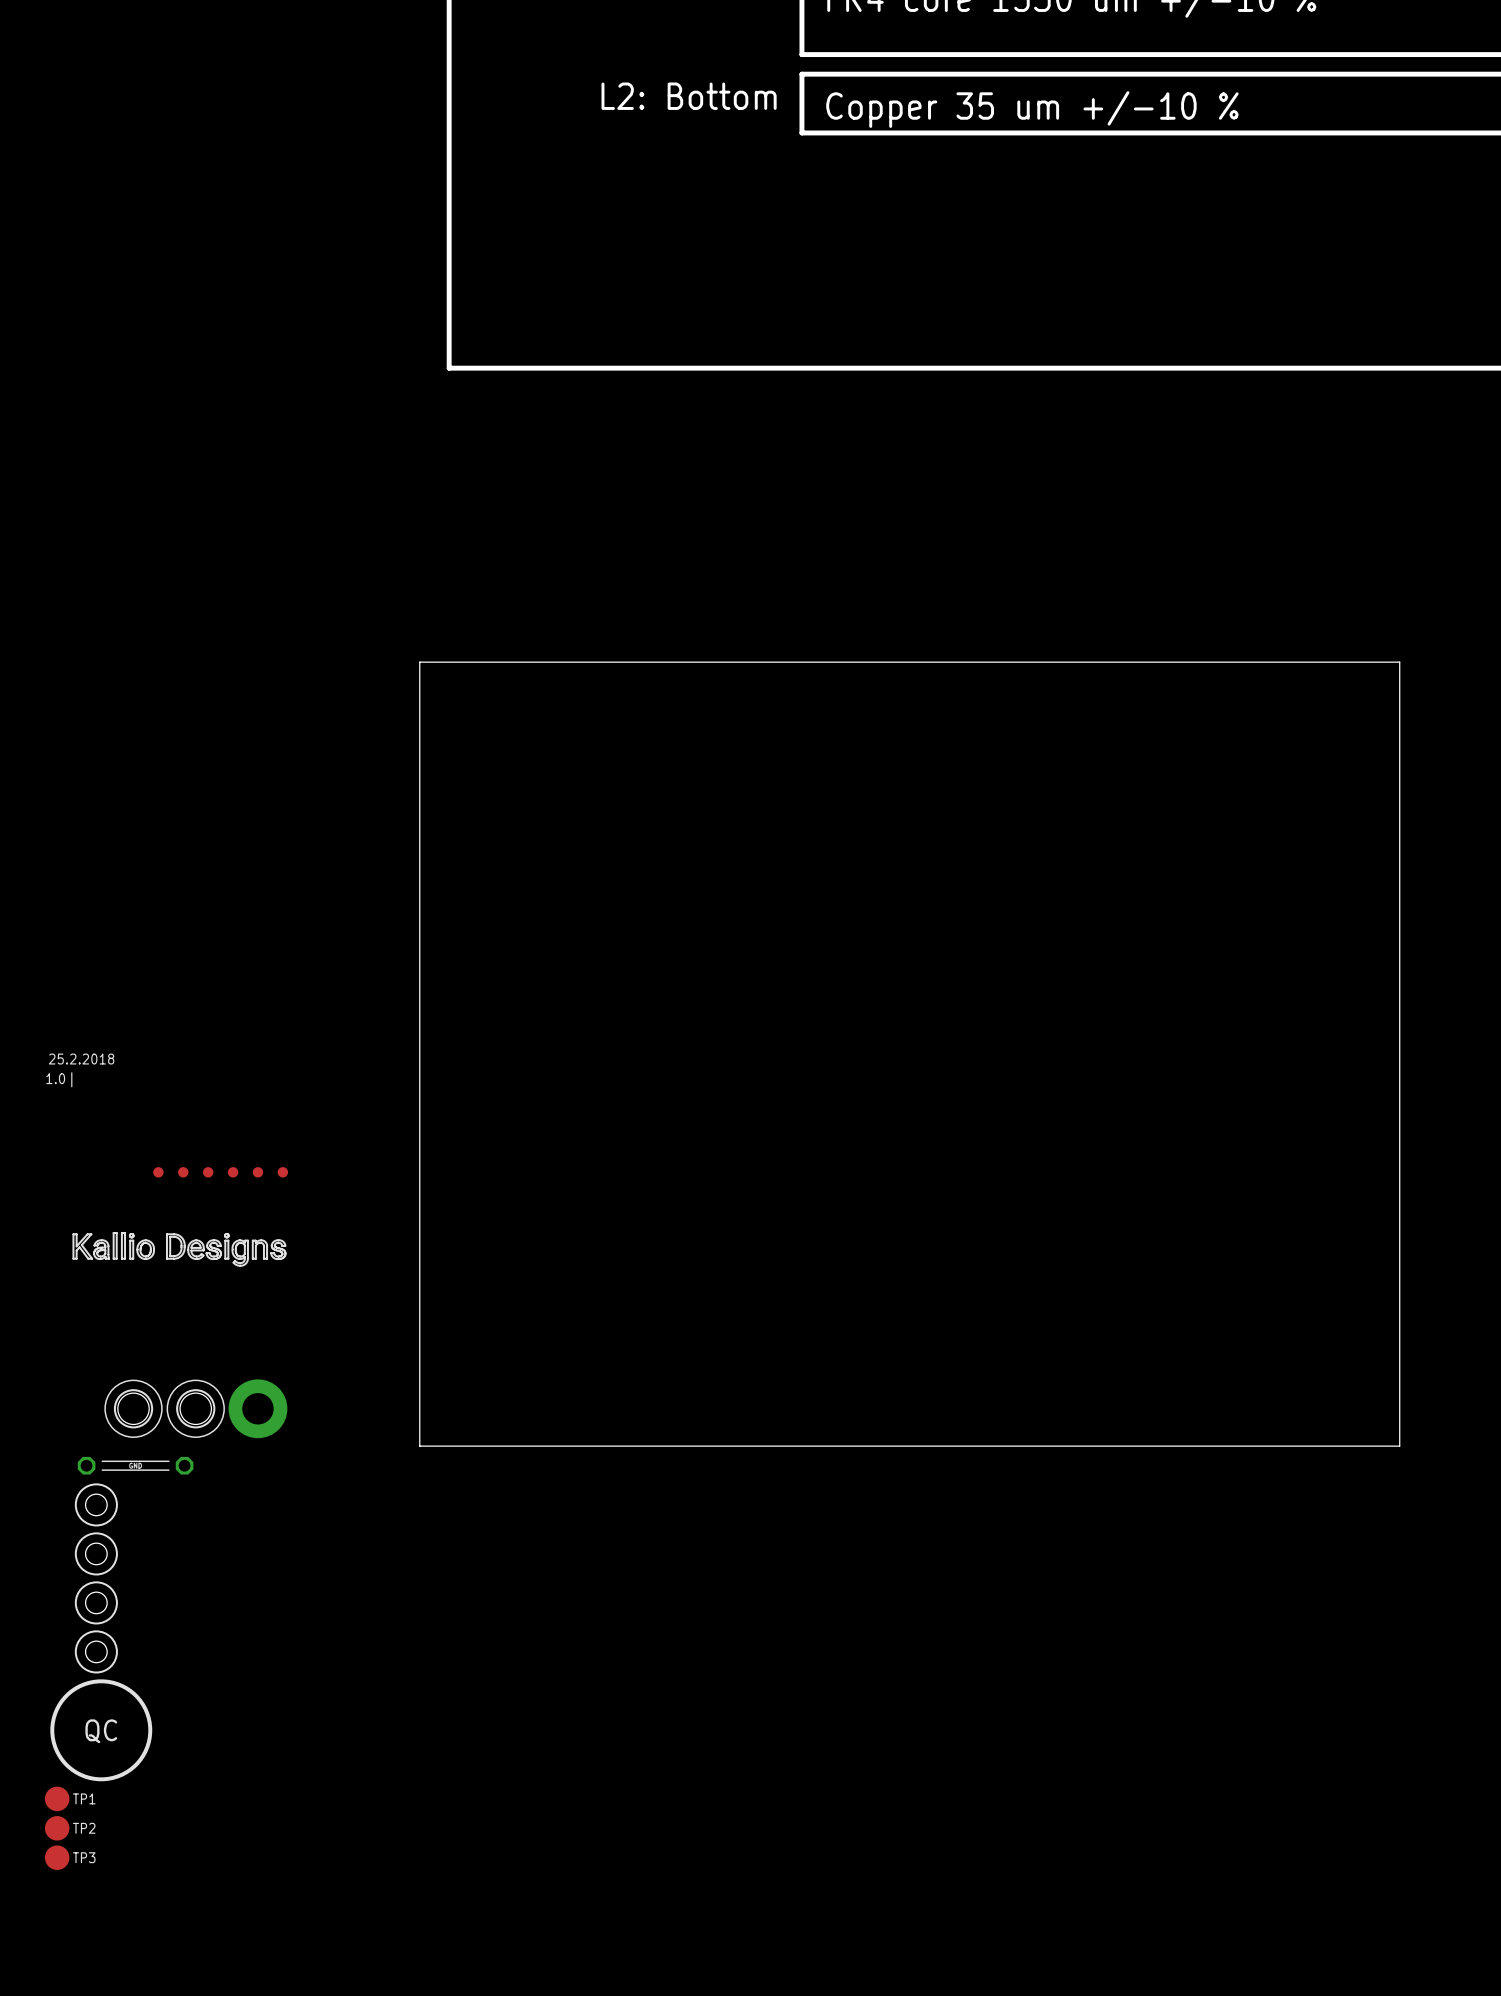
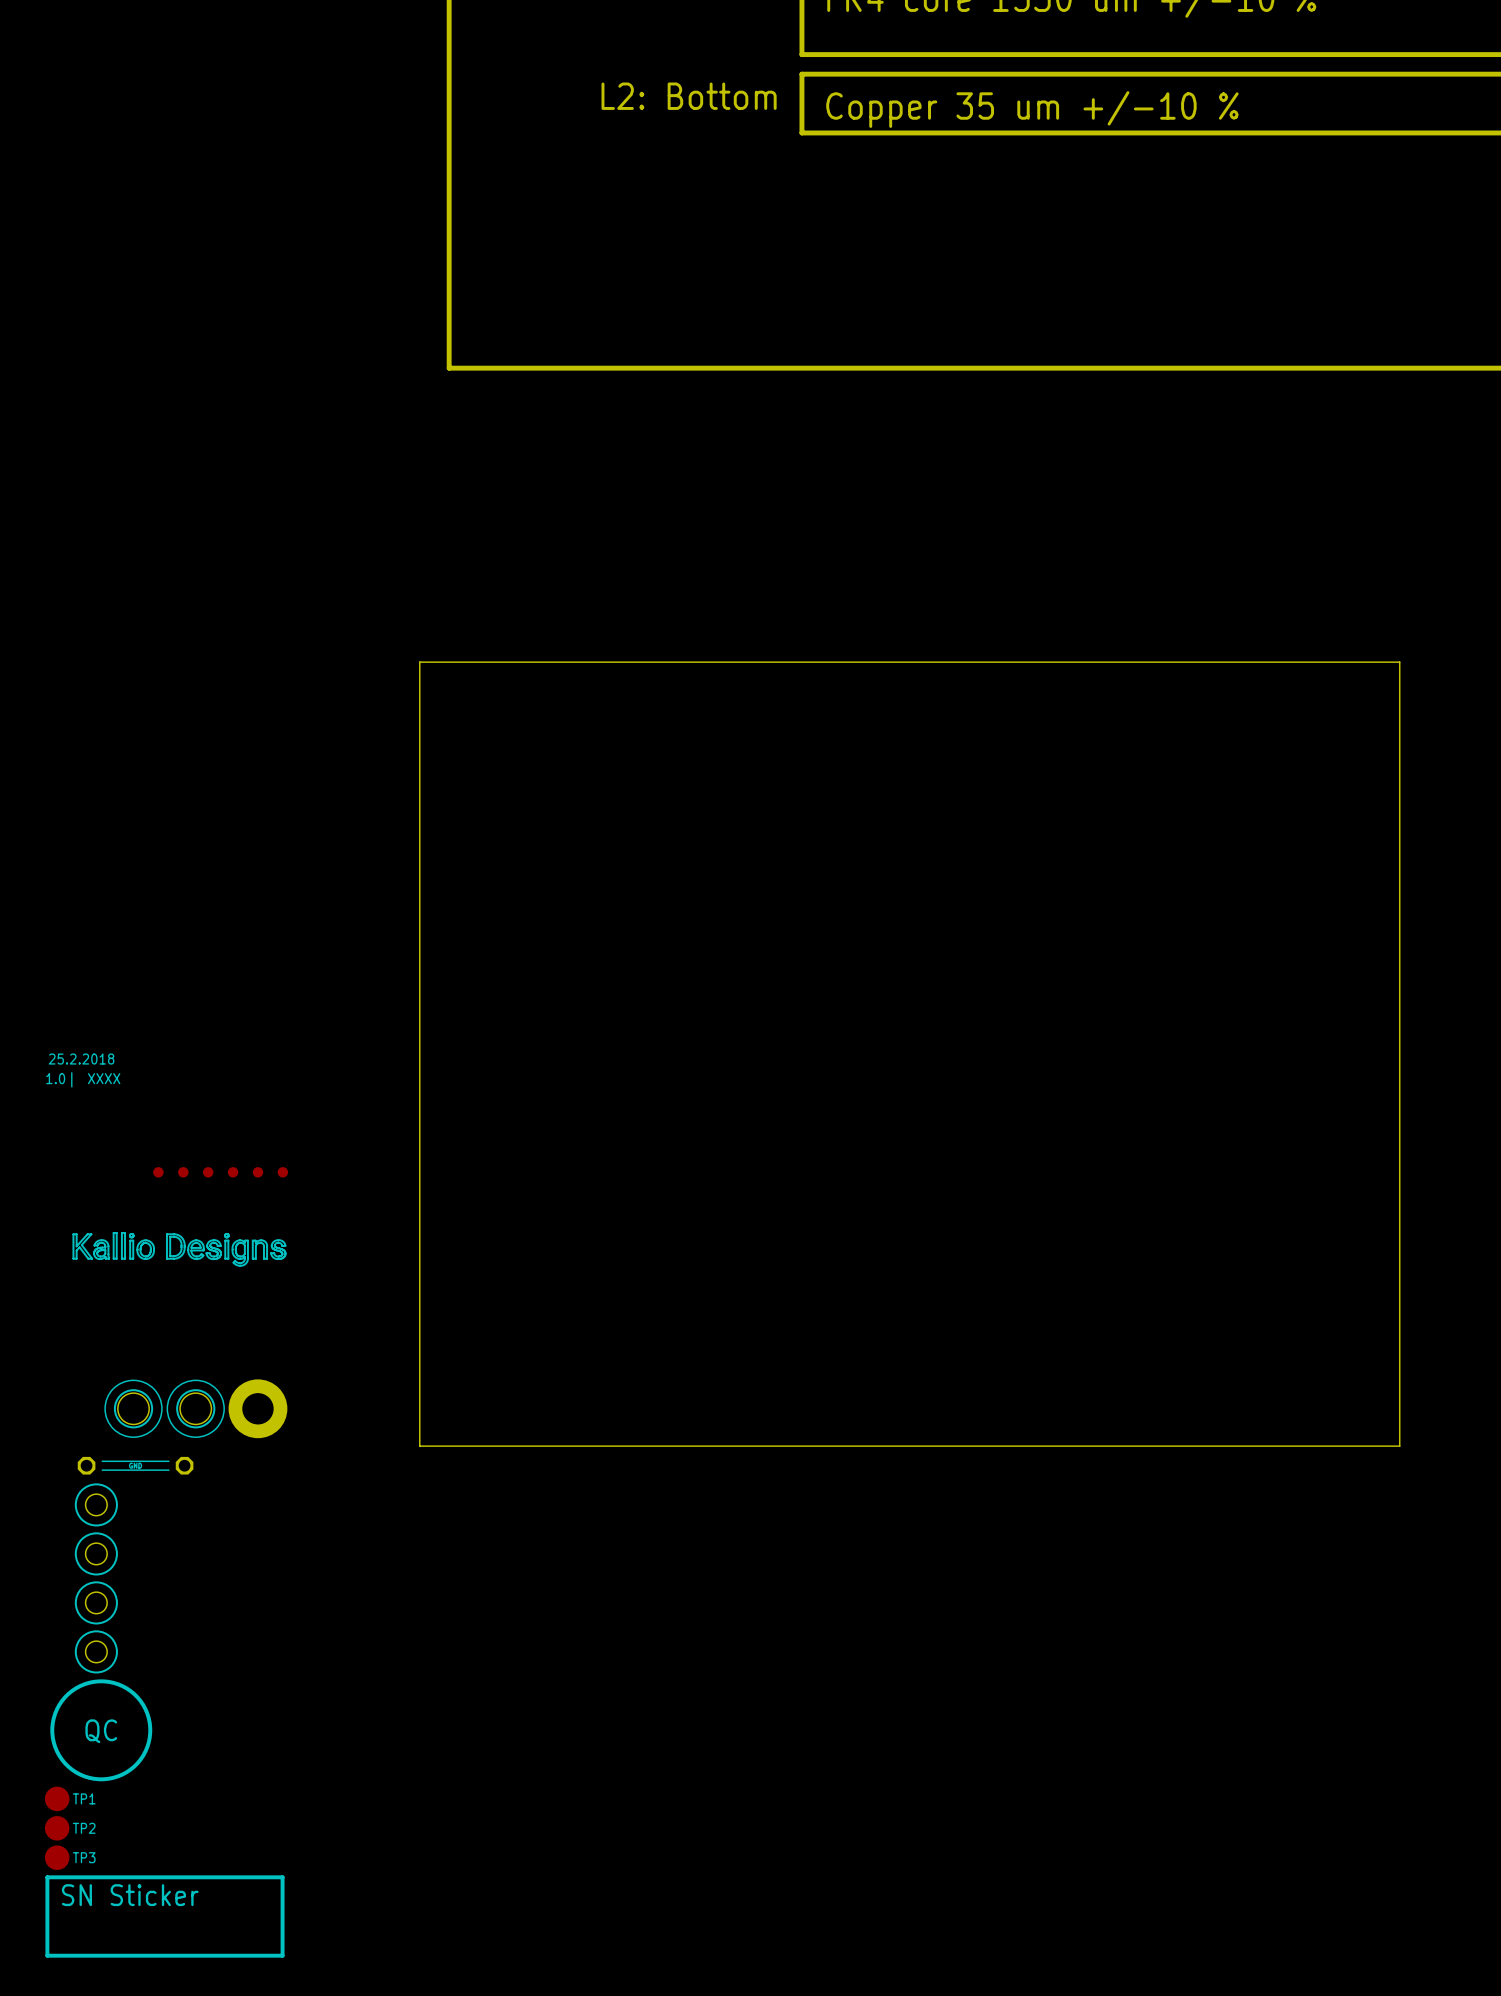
text: none -> XXXX (104, 1078)
drawing: none -> [45, 1875, 285, 1958]

